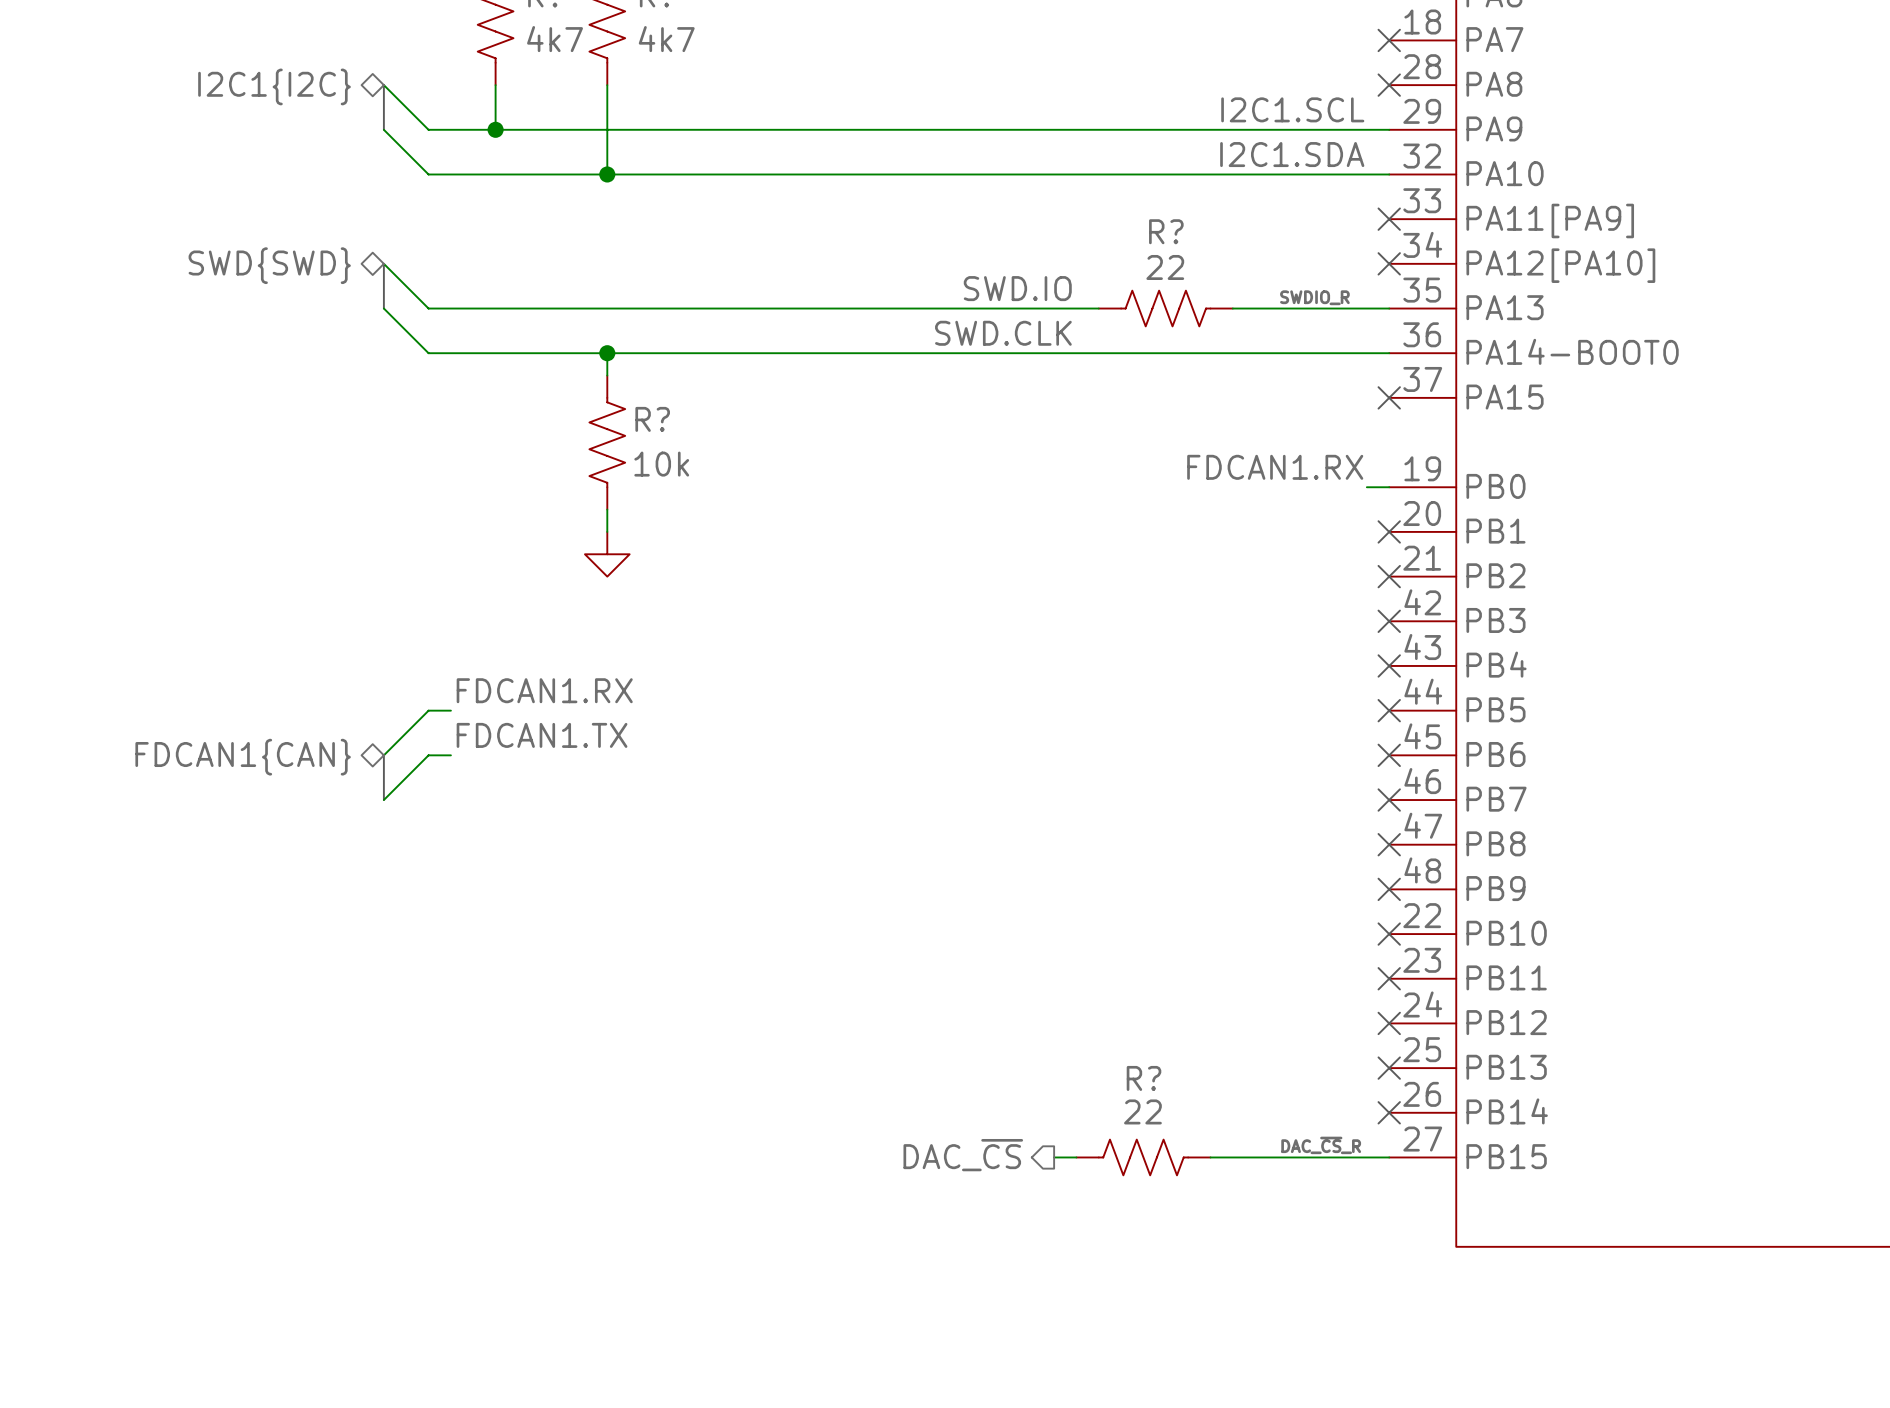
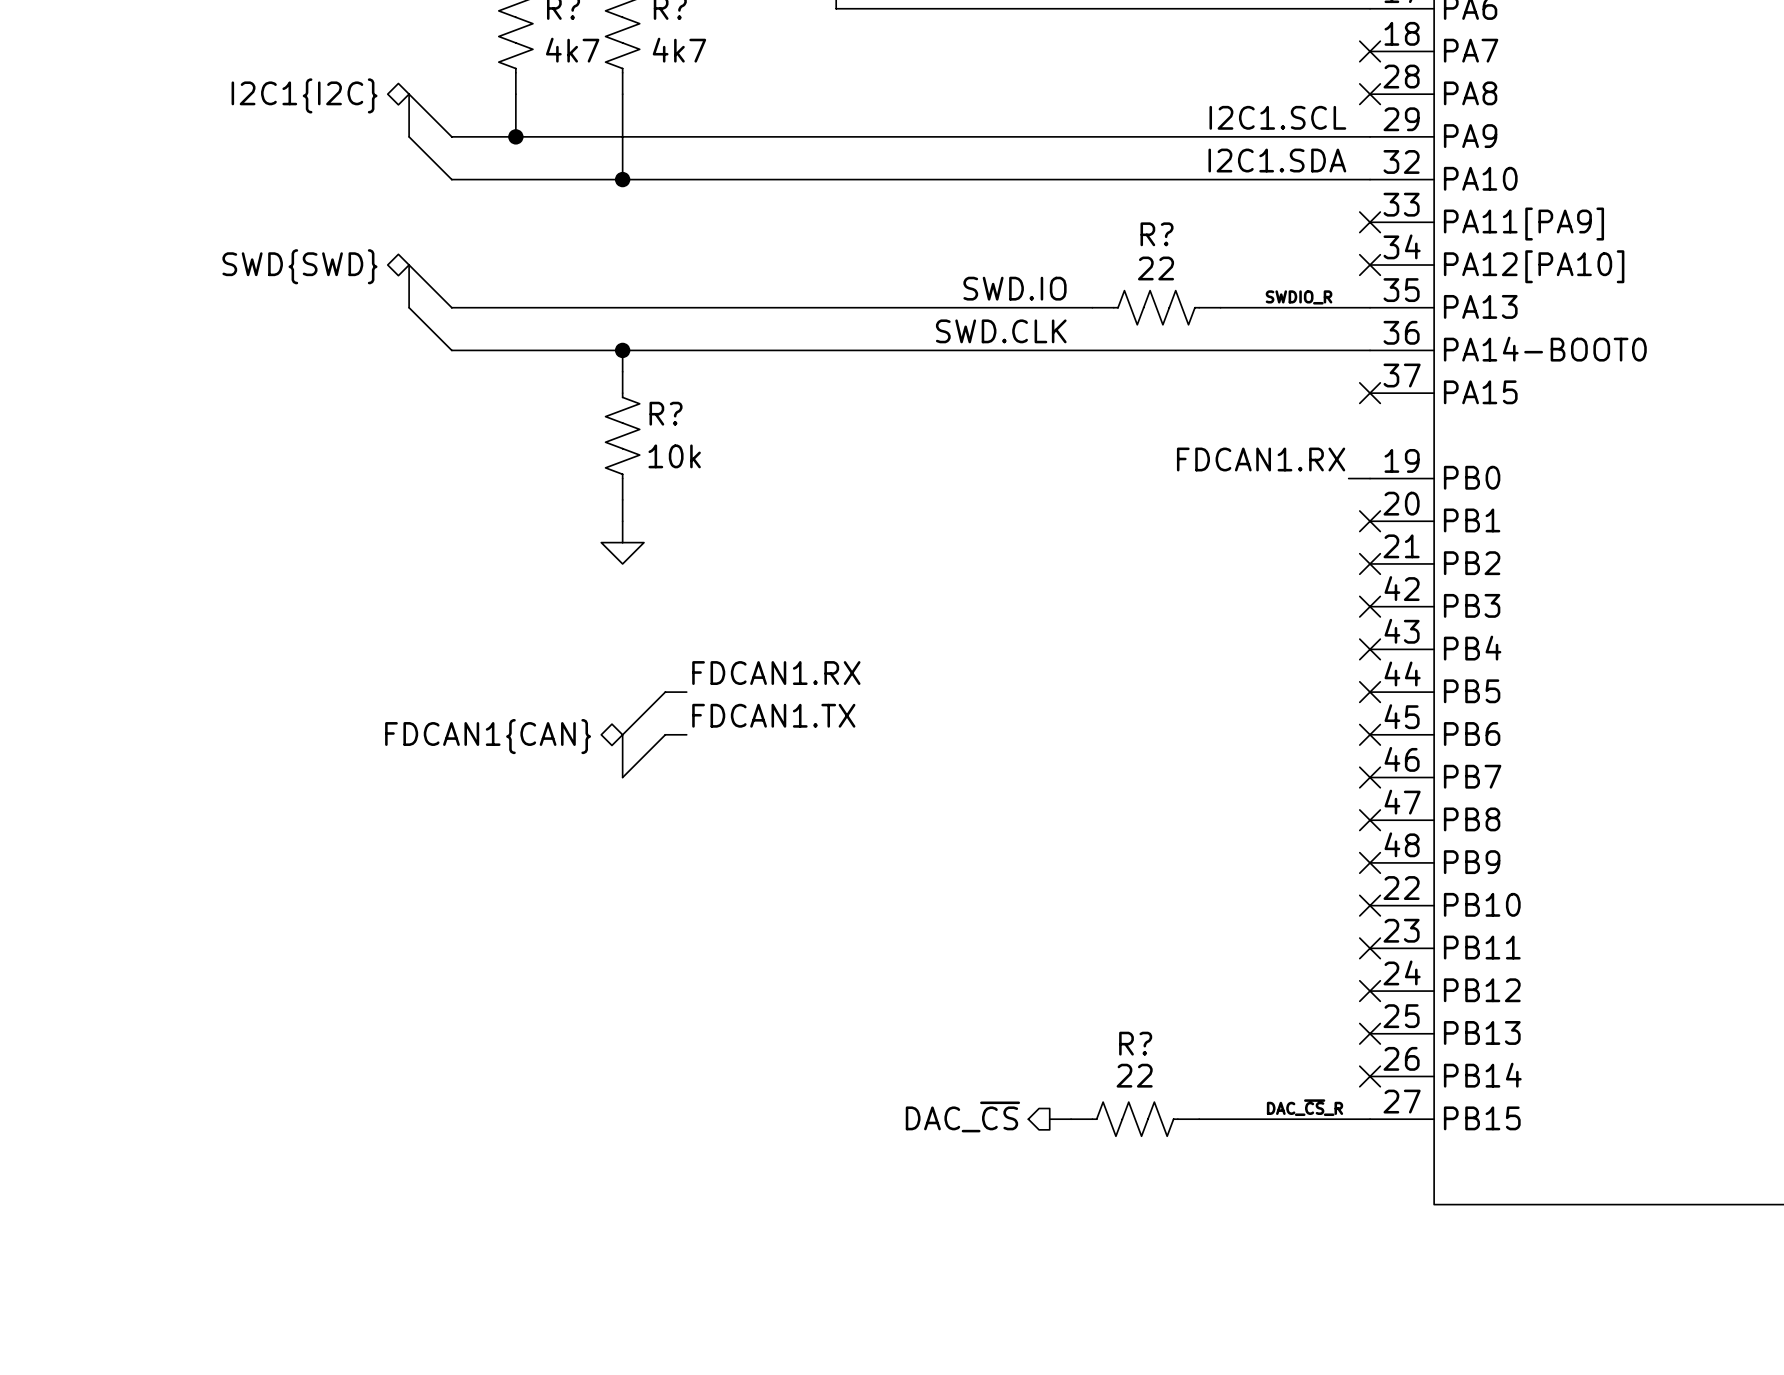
label position: FDCAN1.RX (544, 690) -> FDCAN1.RX (776, 673)
wire: (450, 710) (428, 710) (383, 755) -> (686, 692) (665, 692) (622, 734)
label position: FDCAN1.TX (542, 735) -> FDCAN1.TX (773, 715)
bus: (383, 755) (383, 800) -> (622, 734) (622, 777)
wire: (450, 755) (428, 755) (383, 800) -> (686, 734) (665, 734) (622, 777)
hierarchical label position: FDCAN1{CAN} (243, 757) -> FDCAN1{CAN} (488, 736)

